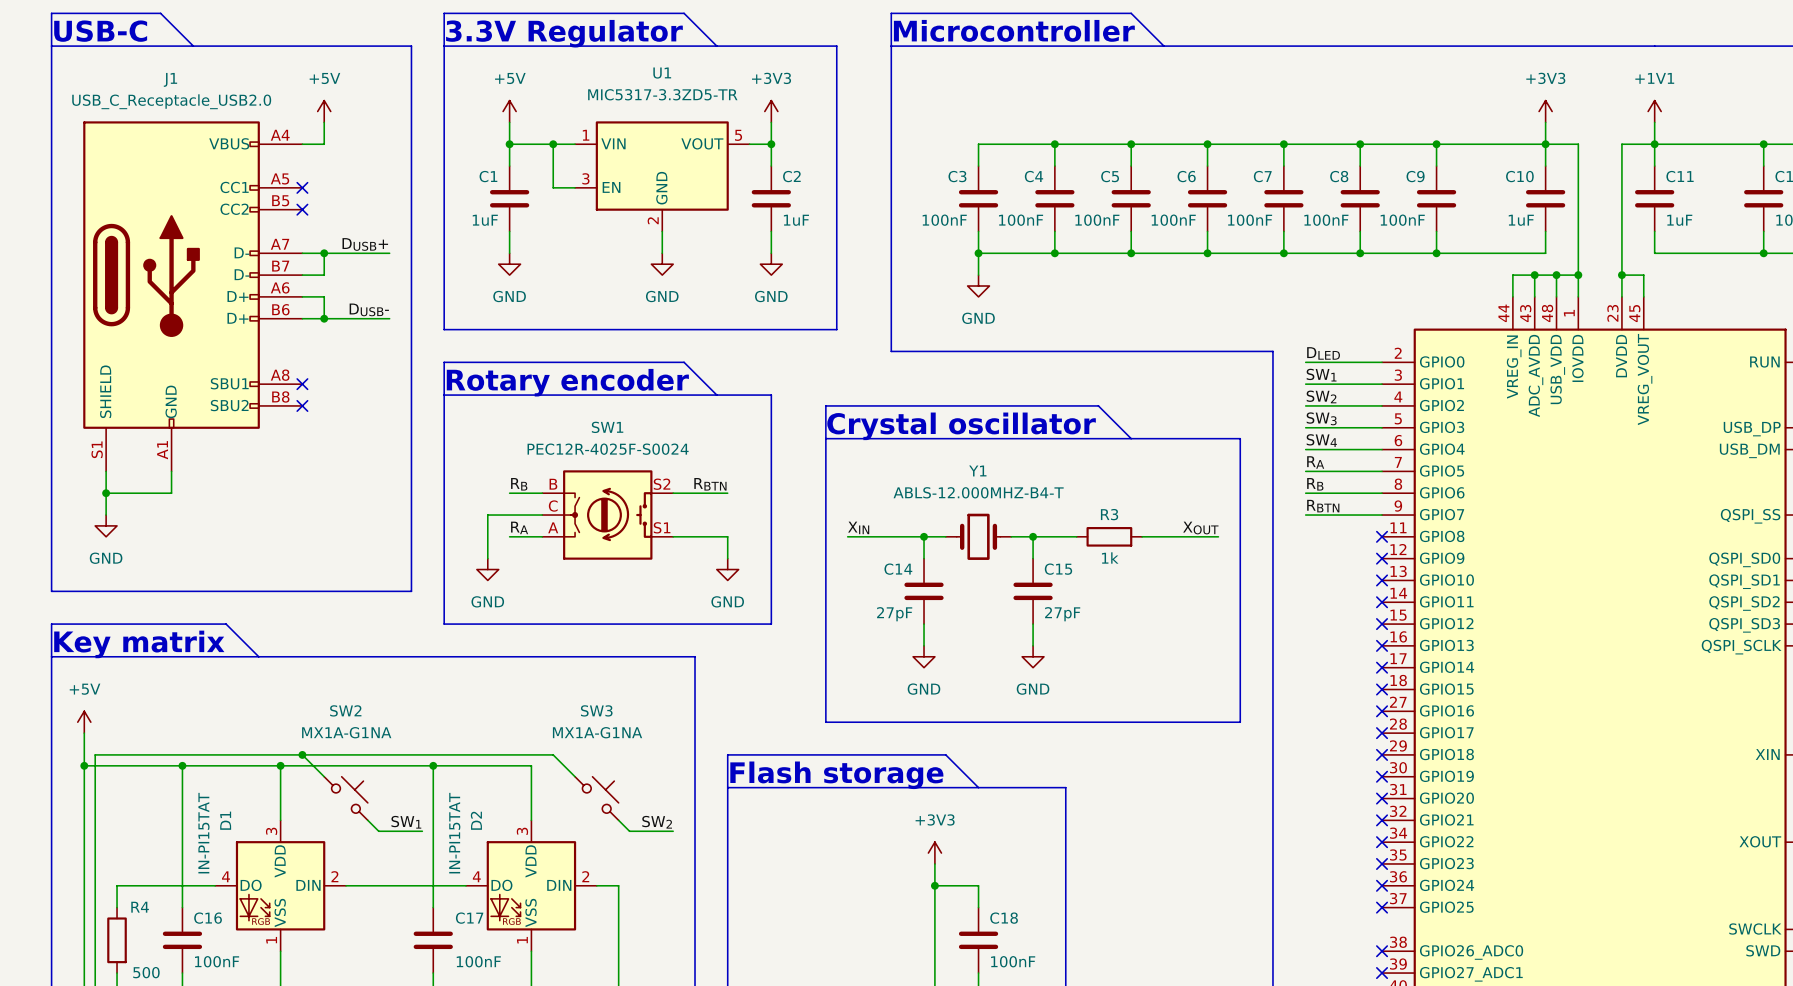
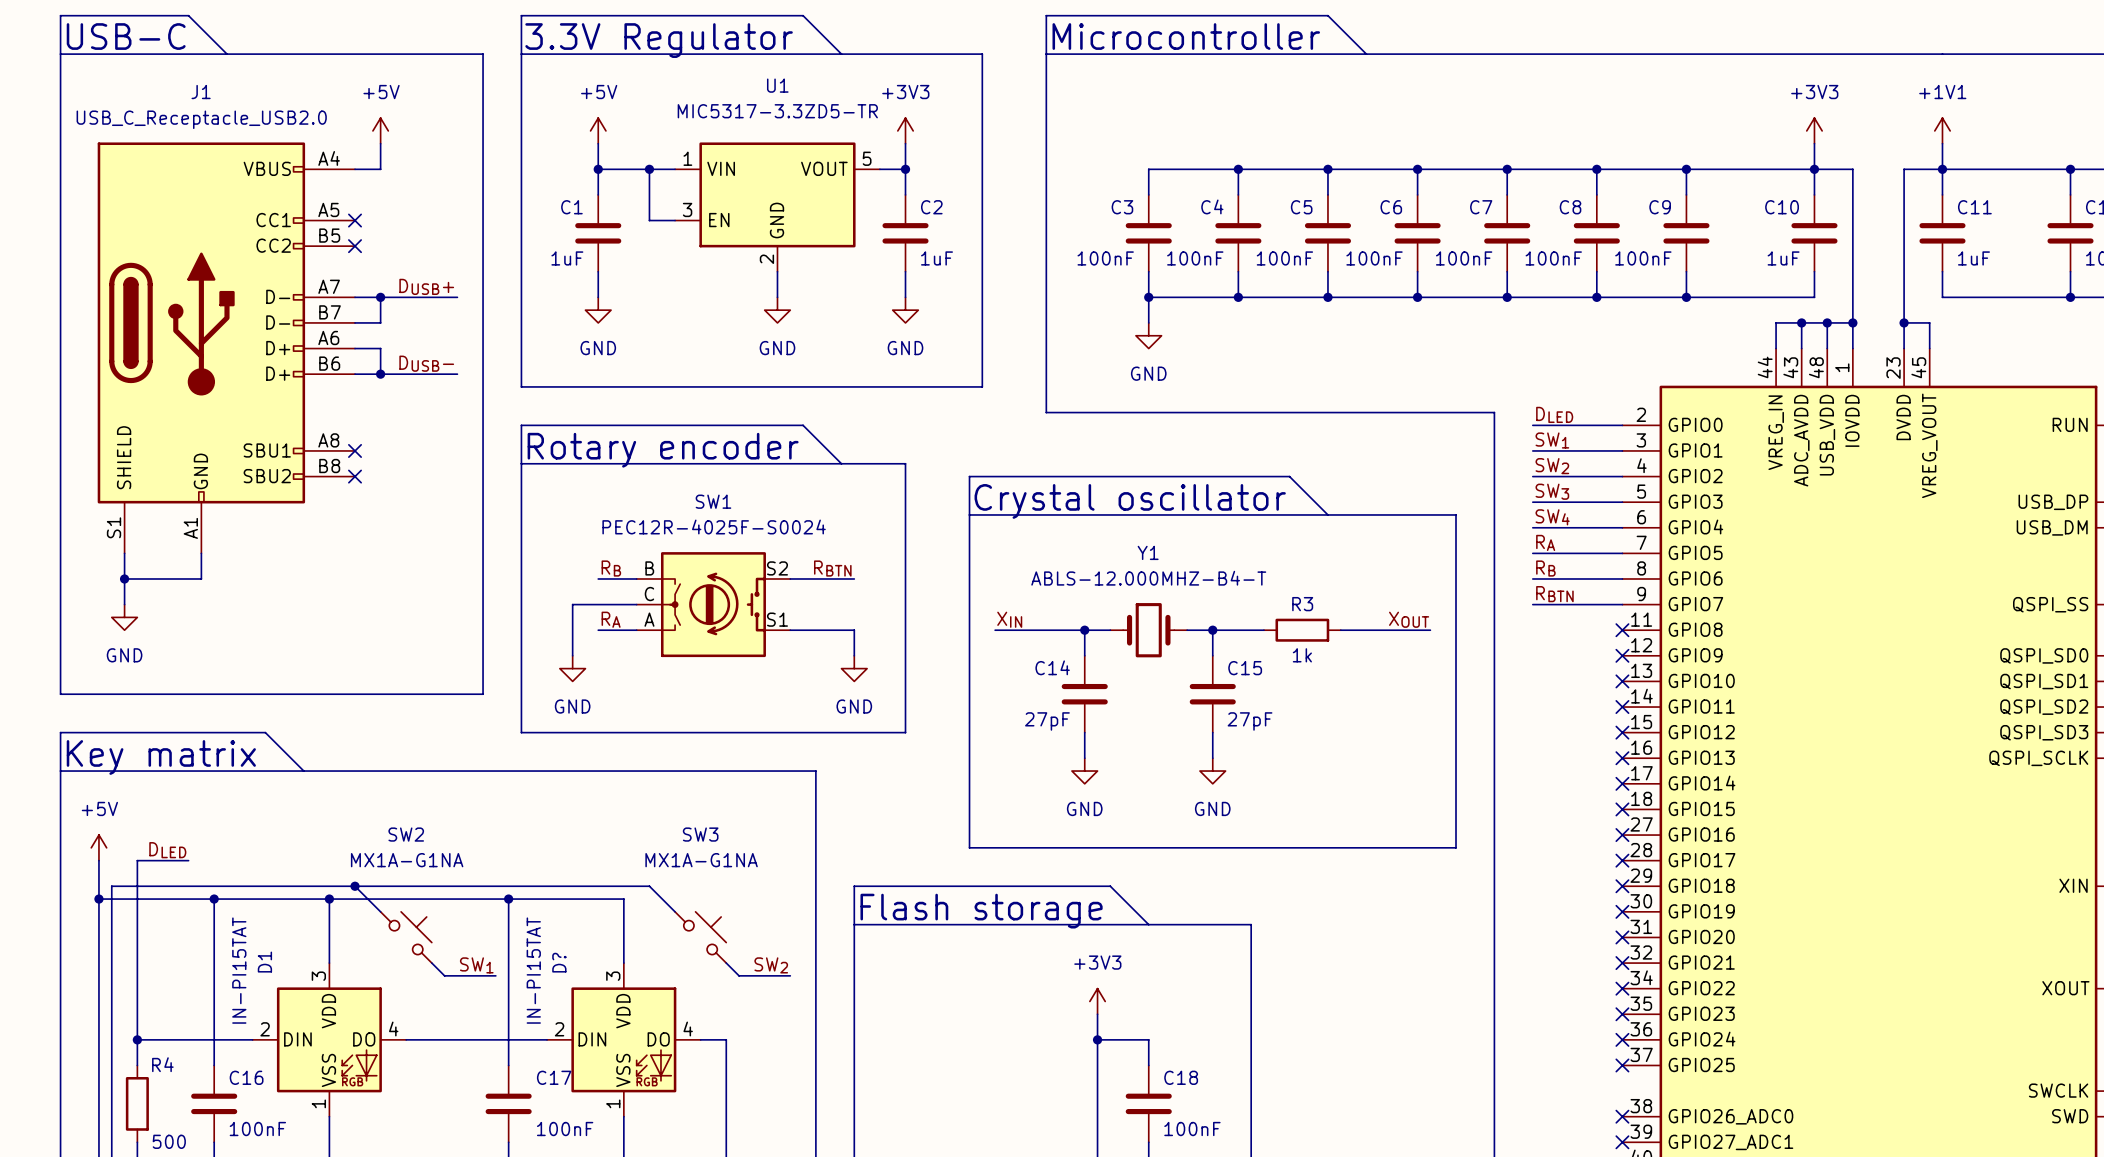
label: none -> DLED (167, 850)
wire: none -> (188, 860) (137, 860) (137, 1039)
junction: none -> (137, 1039)
D1 flip: as is (280, 885) -> left-right (329, 1039)
D2: IN-PI15TAT (531, 885) -> none
D?: none -> IN-PI15TAT (623, 1039)

